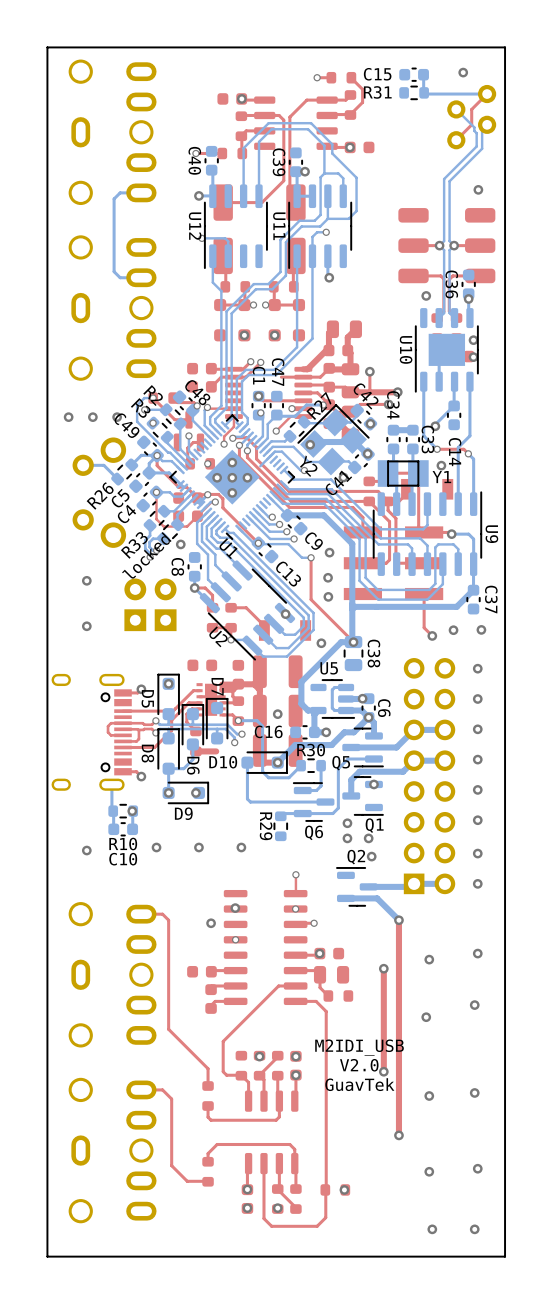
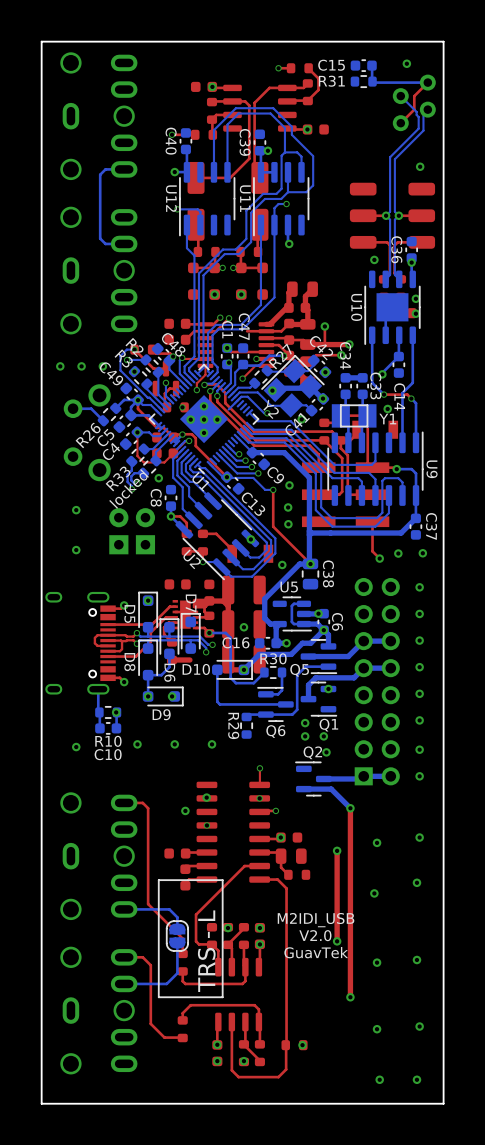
line: none -> (222, 880) (158, 880) (158, 997) (222, 997) (222, 880)
bottom track: none -> (124, 909) (169, 909) (177, 917) (177, 929)
part: none -> (177, 936)
bottom track: none -> (177, 942) (177, 973) (166, 983) (124, 983)
text: none -> TRS - L (206, 951)

